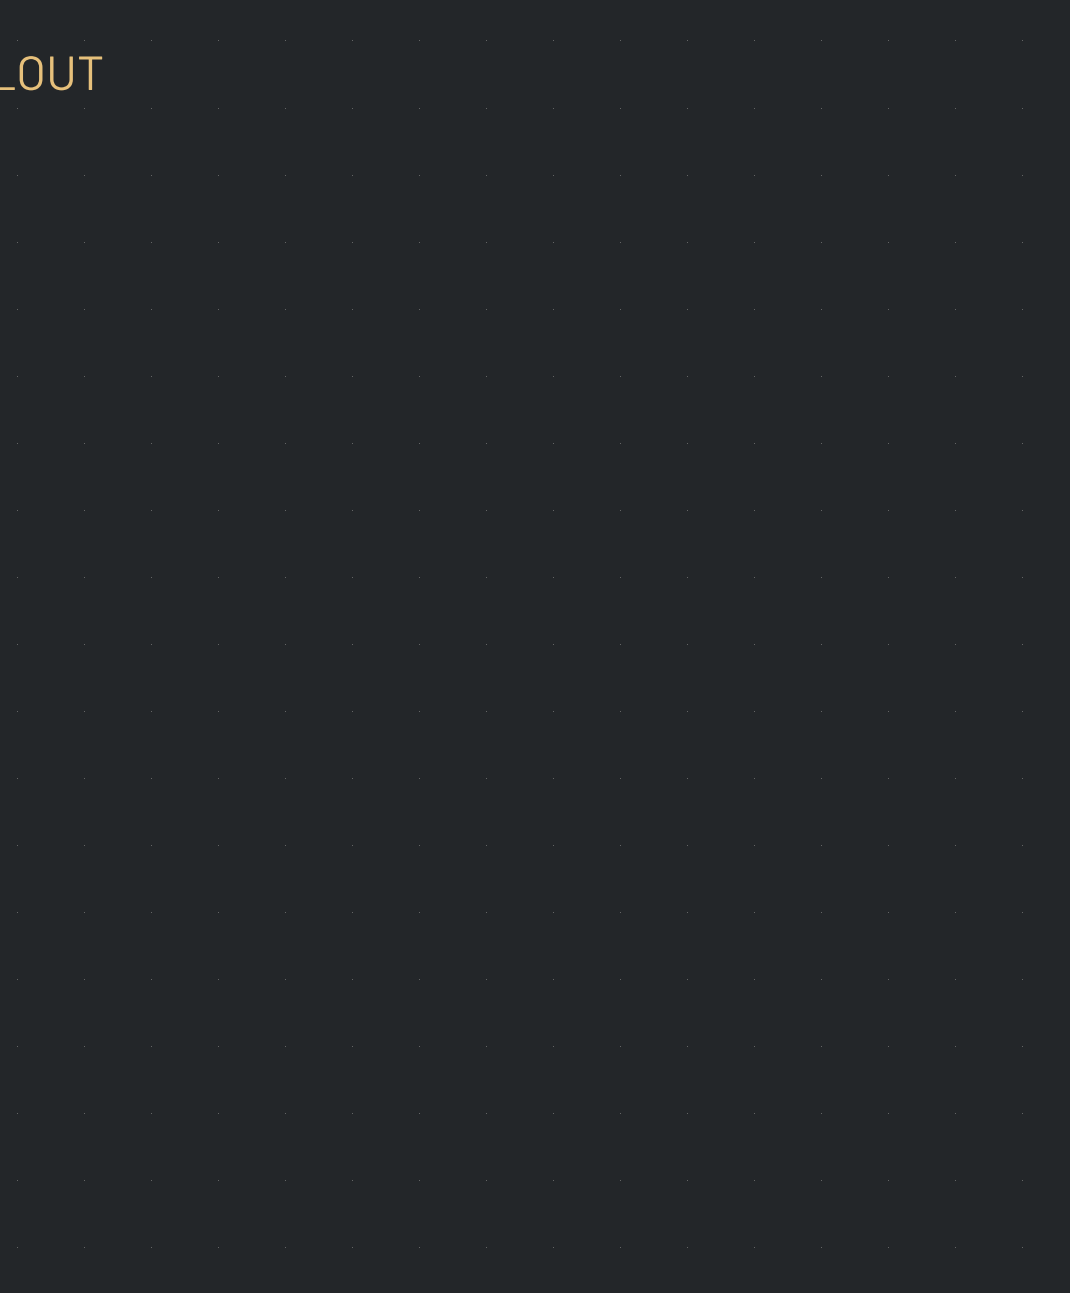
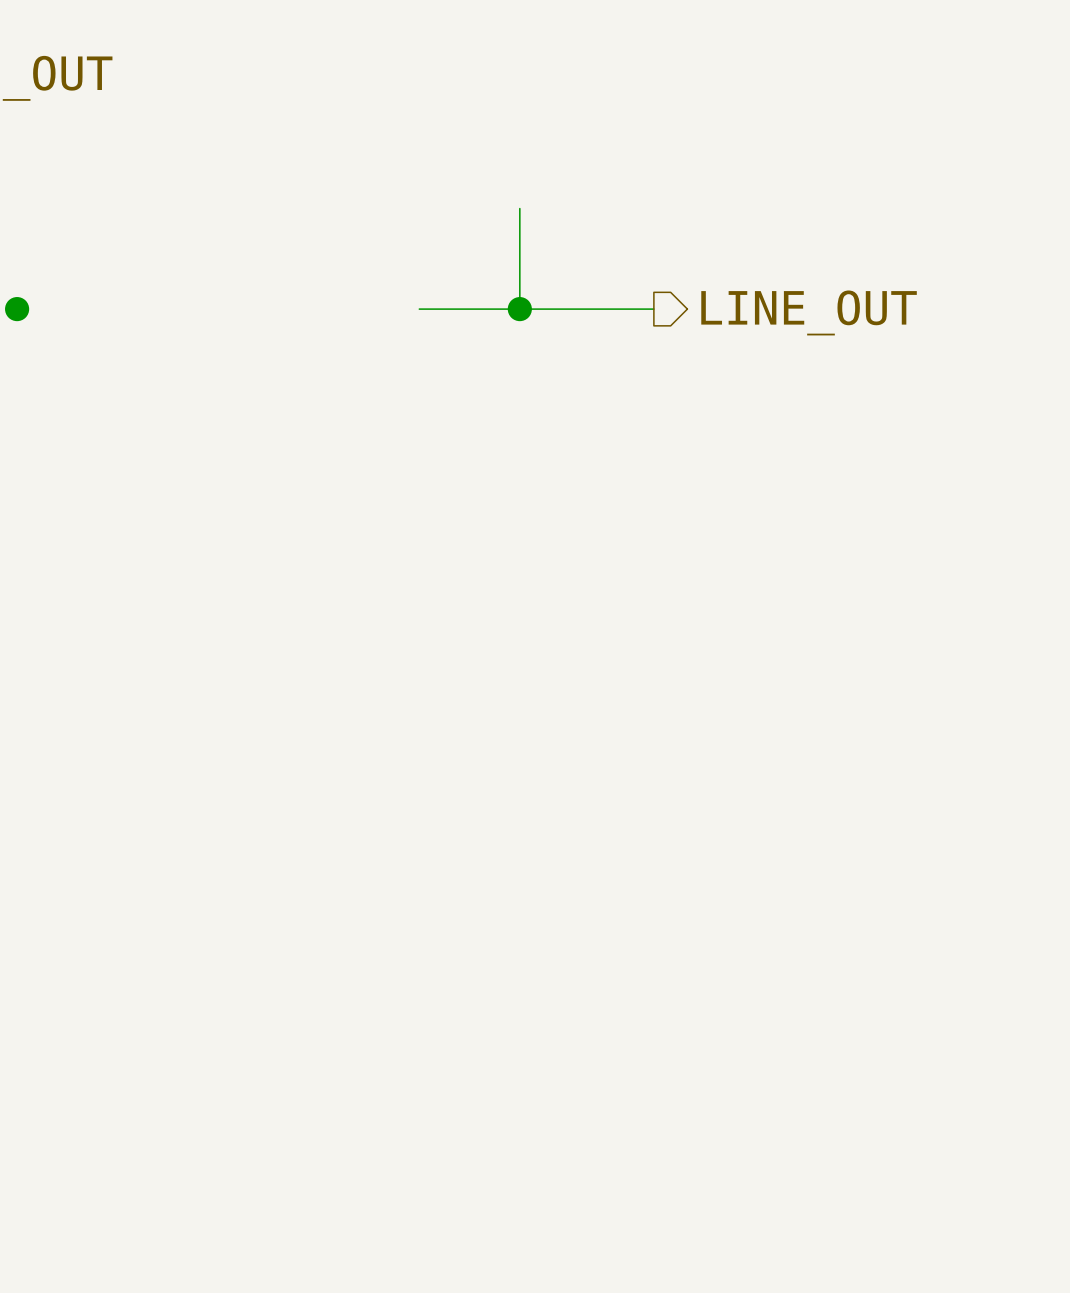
wire: none -> (519, 208) (519, 309)
hierarchical label: none -> LINE_OUT (809, 312)
junction: none -> (17, 309)
wire: none -> (419, 309) (653, 309)
junction: none -> (519, 309)

